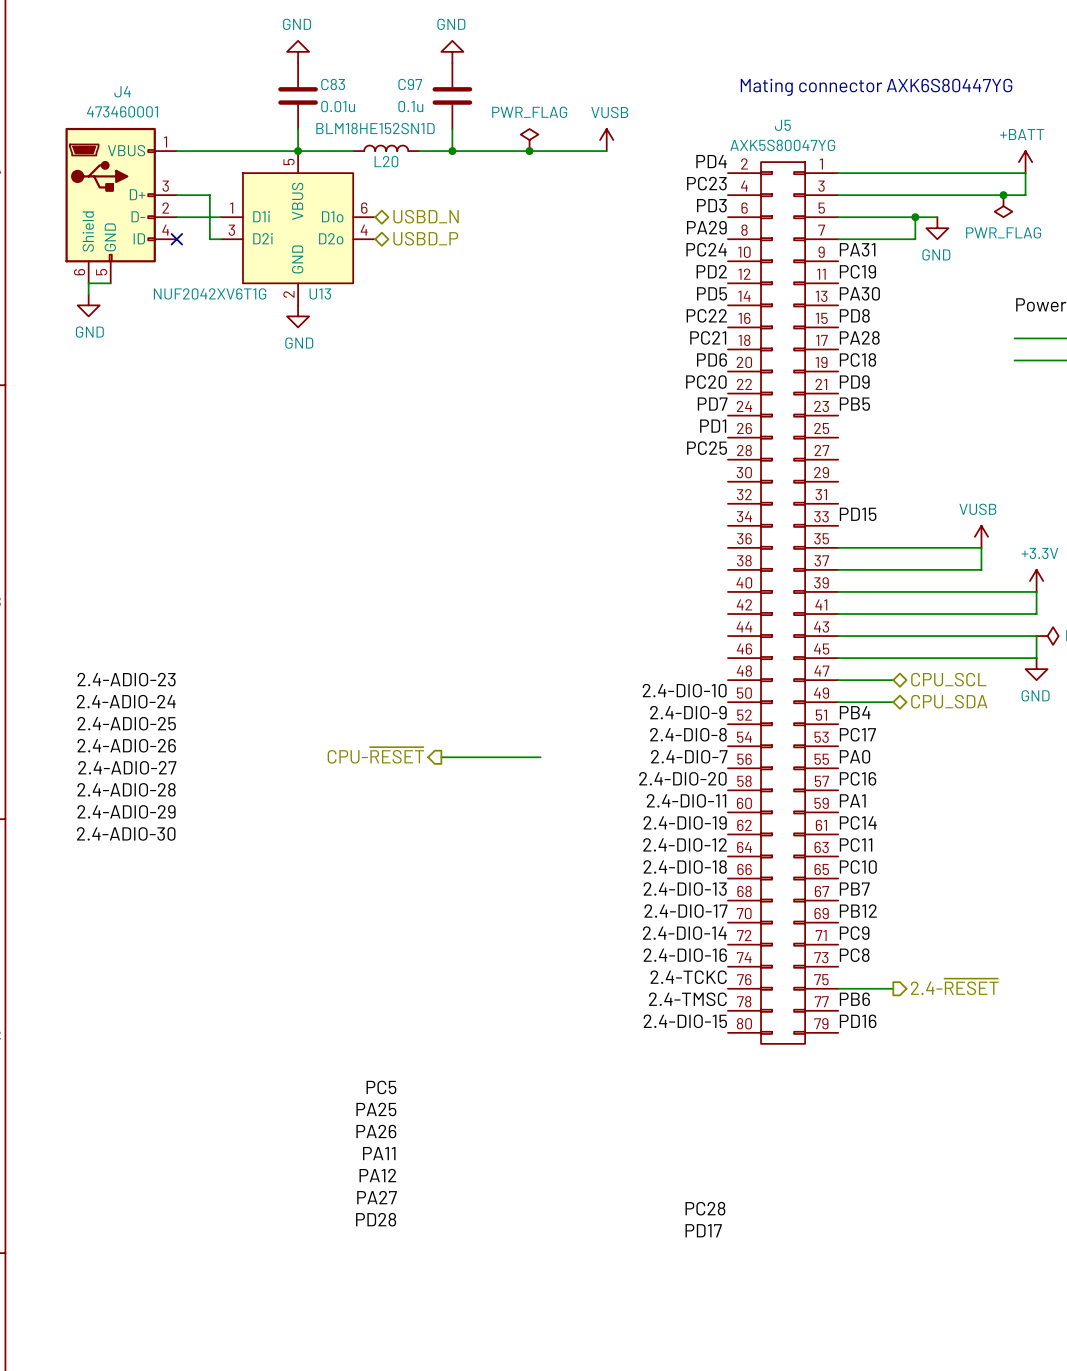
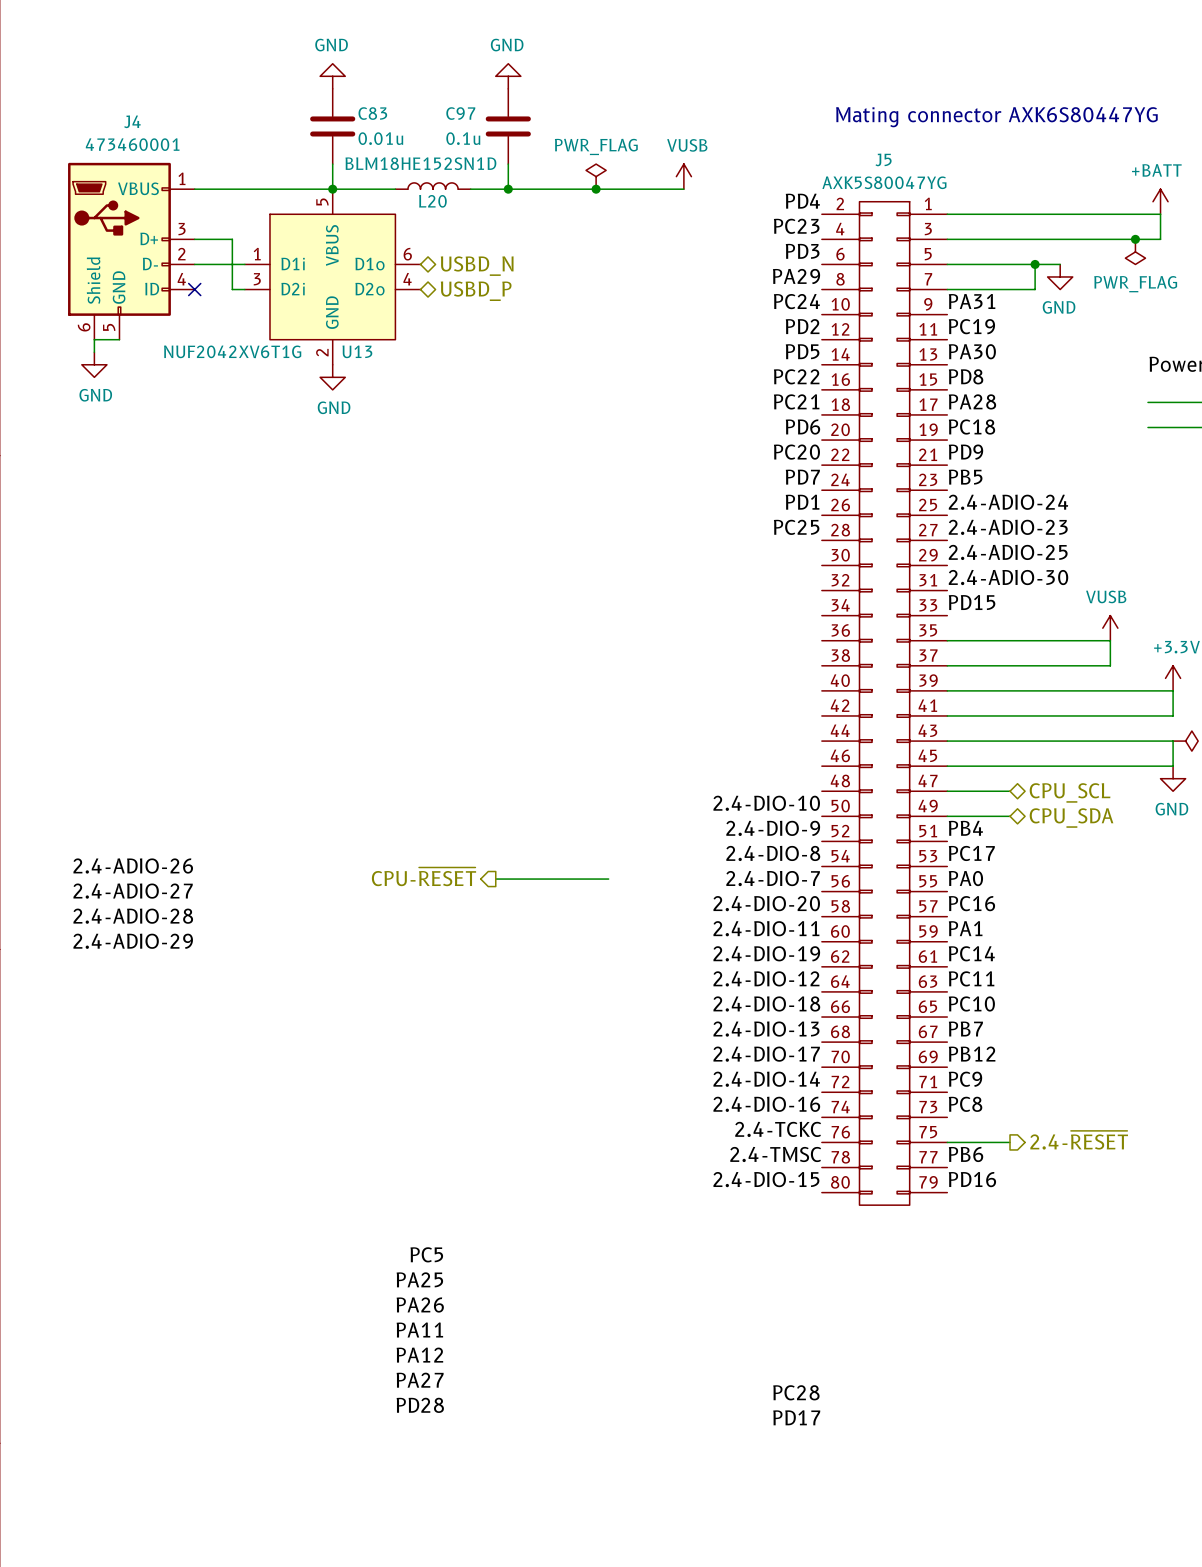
label: none -> 2.4-ADIO-24 (1008, 502)
label: none -> 2.4-ADIO-23 (1008, 527)
label: none -> 2.4-ADIO-25 (1008, 552)
label: none -> 2.4-ADIO-30 (1008, 577)
label: 2.4-ADIO-23 (126, 679) -> none
label: 2.4-ADIO-24 (126, 701) -> none
label: 2.4-ADIO-25 (126, 723) -> none
label: 2.4-ADIO-30 (126, 833) -> none

